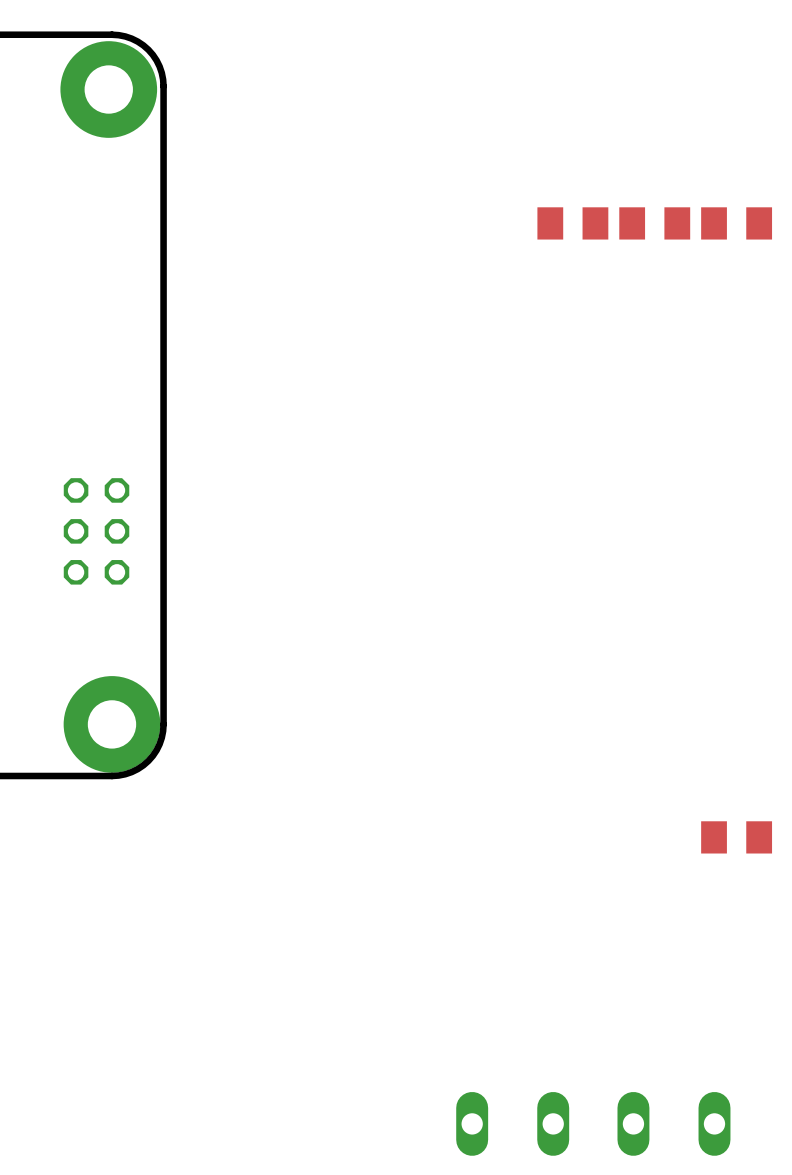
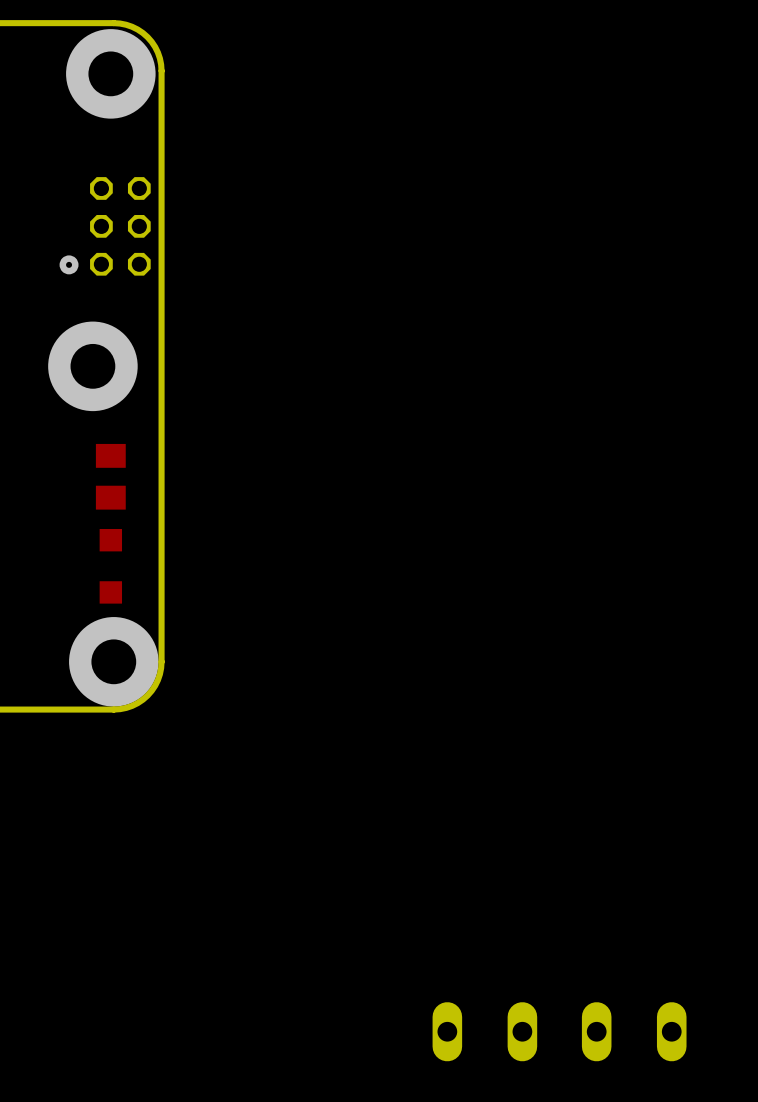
part: (572, 223) -> none
part: (654, 223) -> none
part: (736, 223) -> none
part: none -> (120, 226)
via: none -> (69, 264)
via: none -> (92, 366)
part footprint: [63, 478, 130, 585] -> [95, 443, 126, 510]
part: none -> (110, 566)
part: (736, 837) -> none

